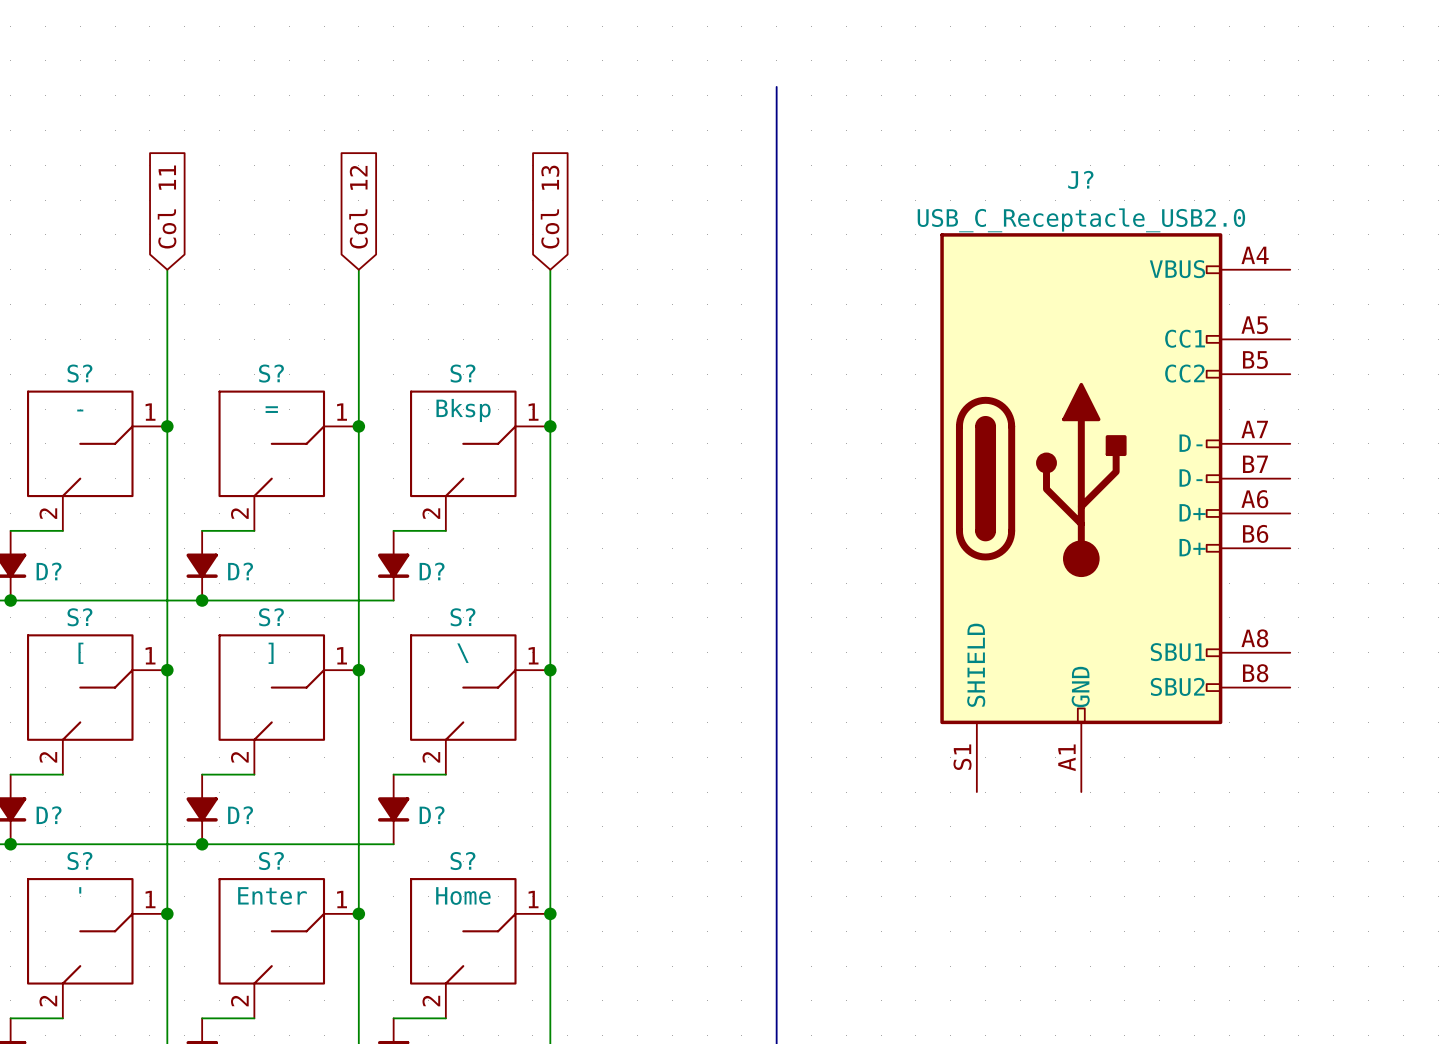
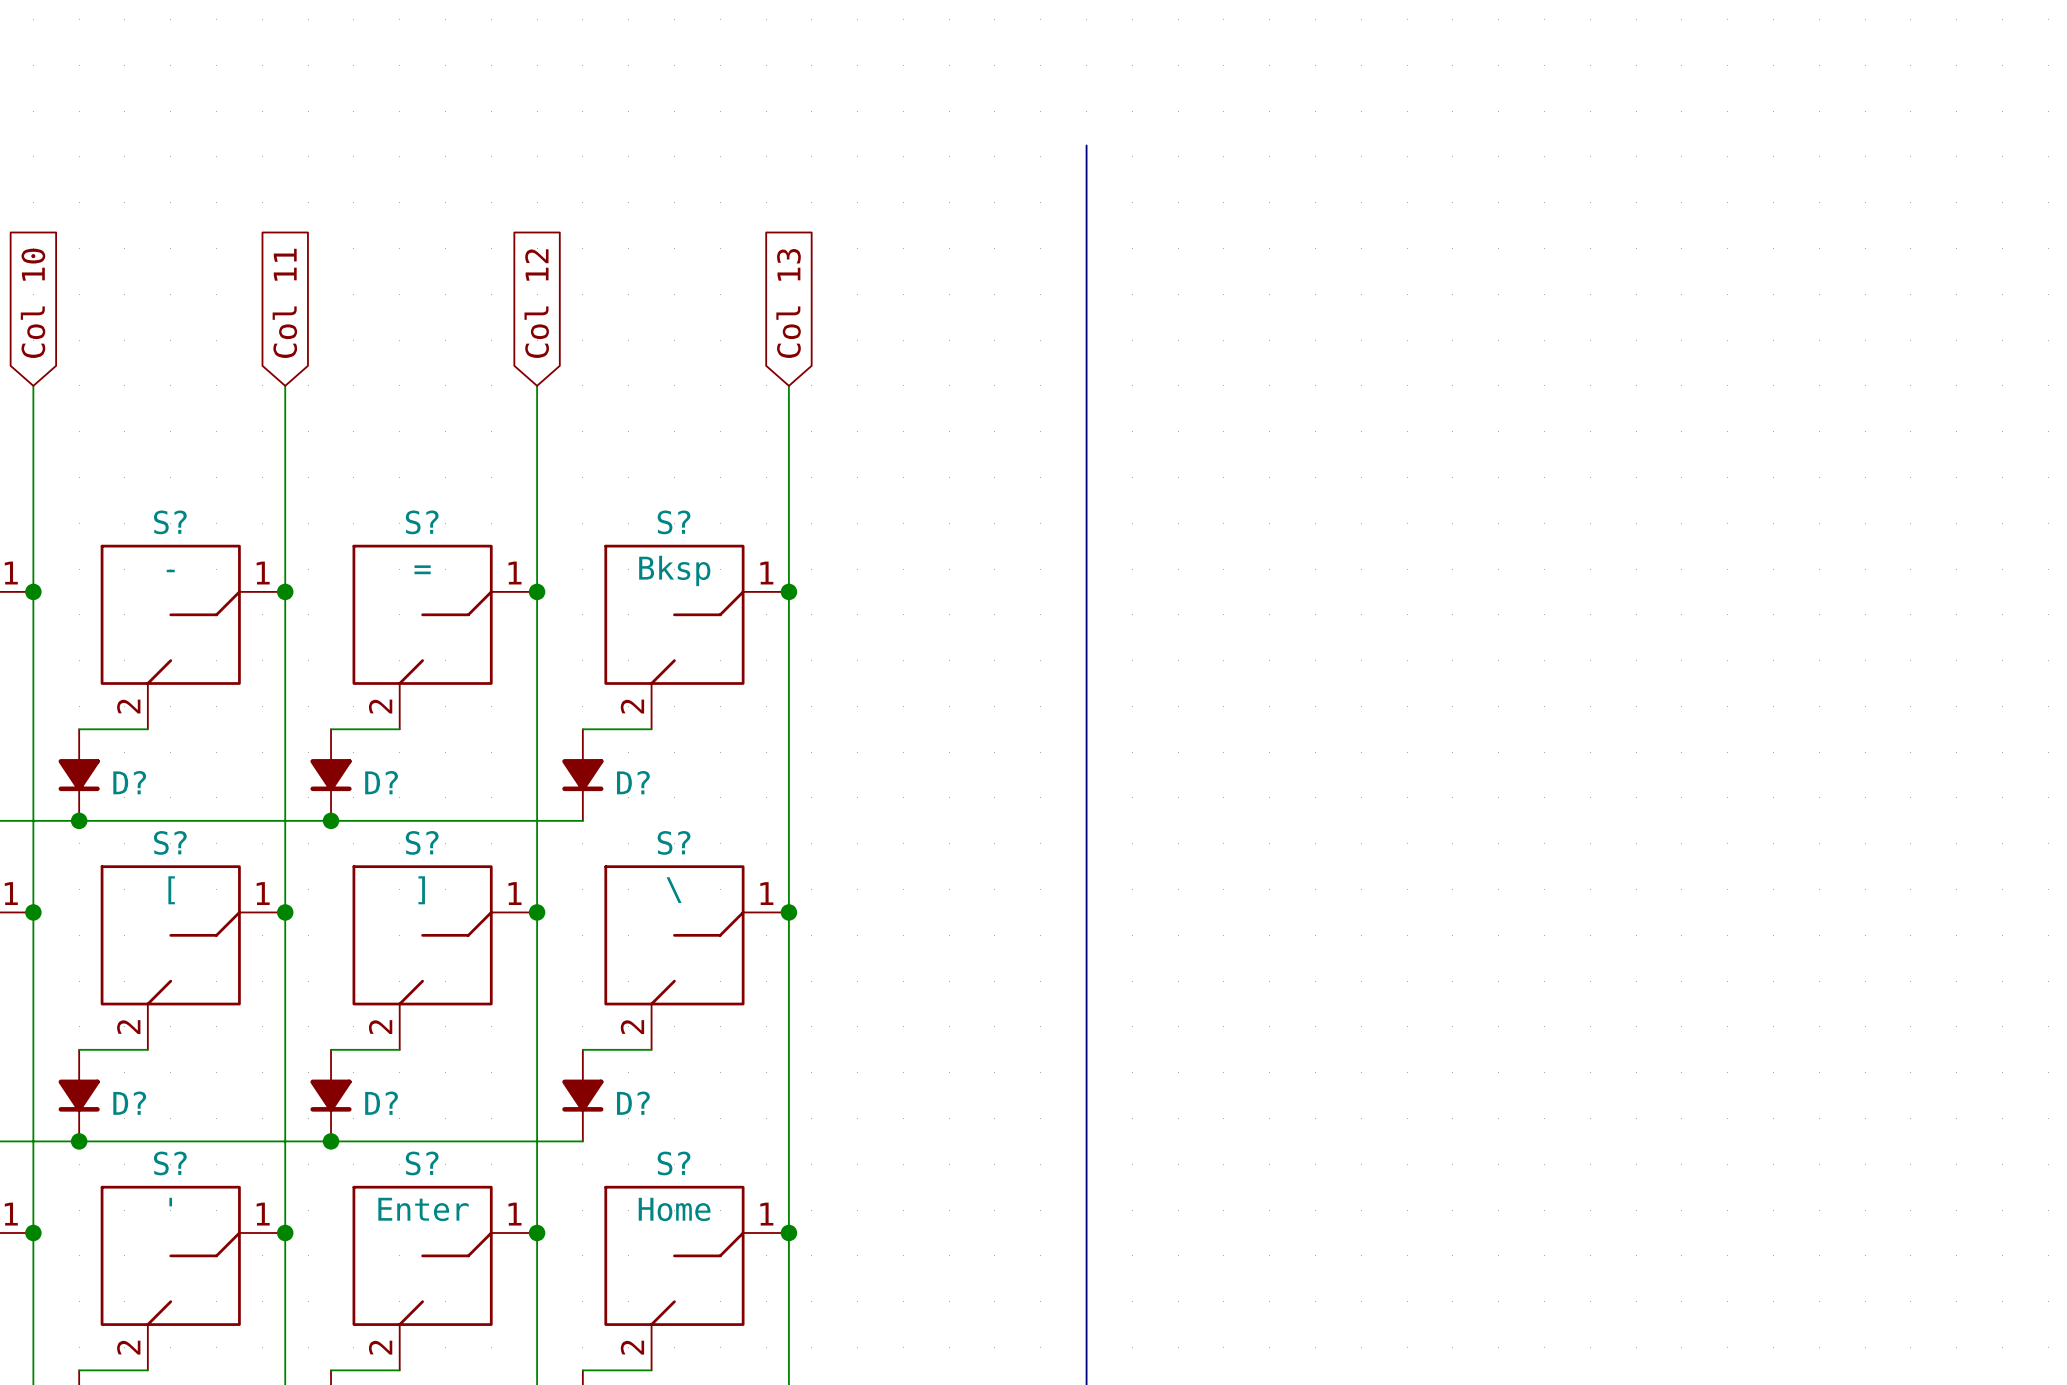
J?: USB_C_Receptacle_USB2.0 (1115, 512) -> none

